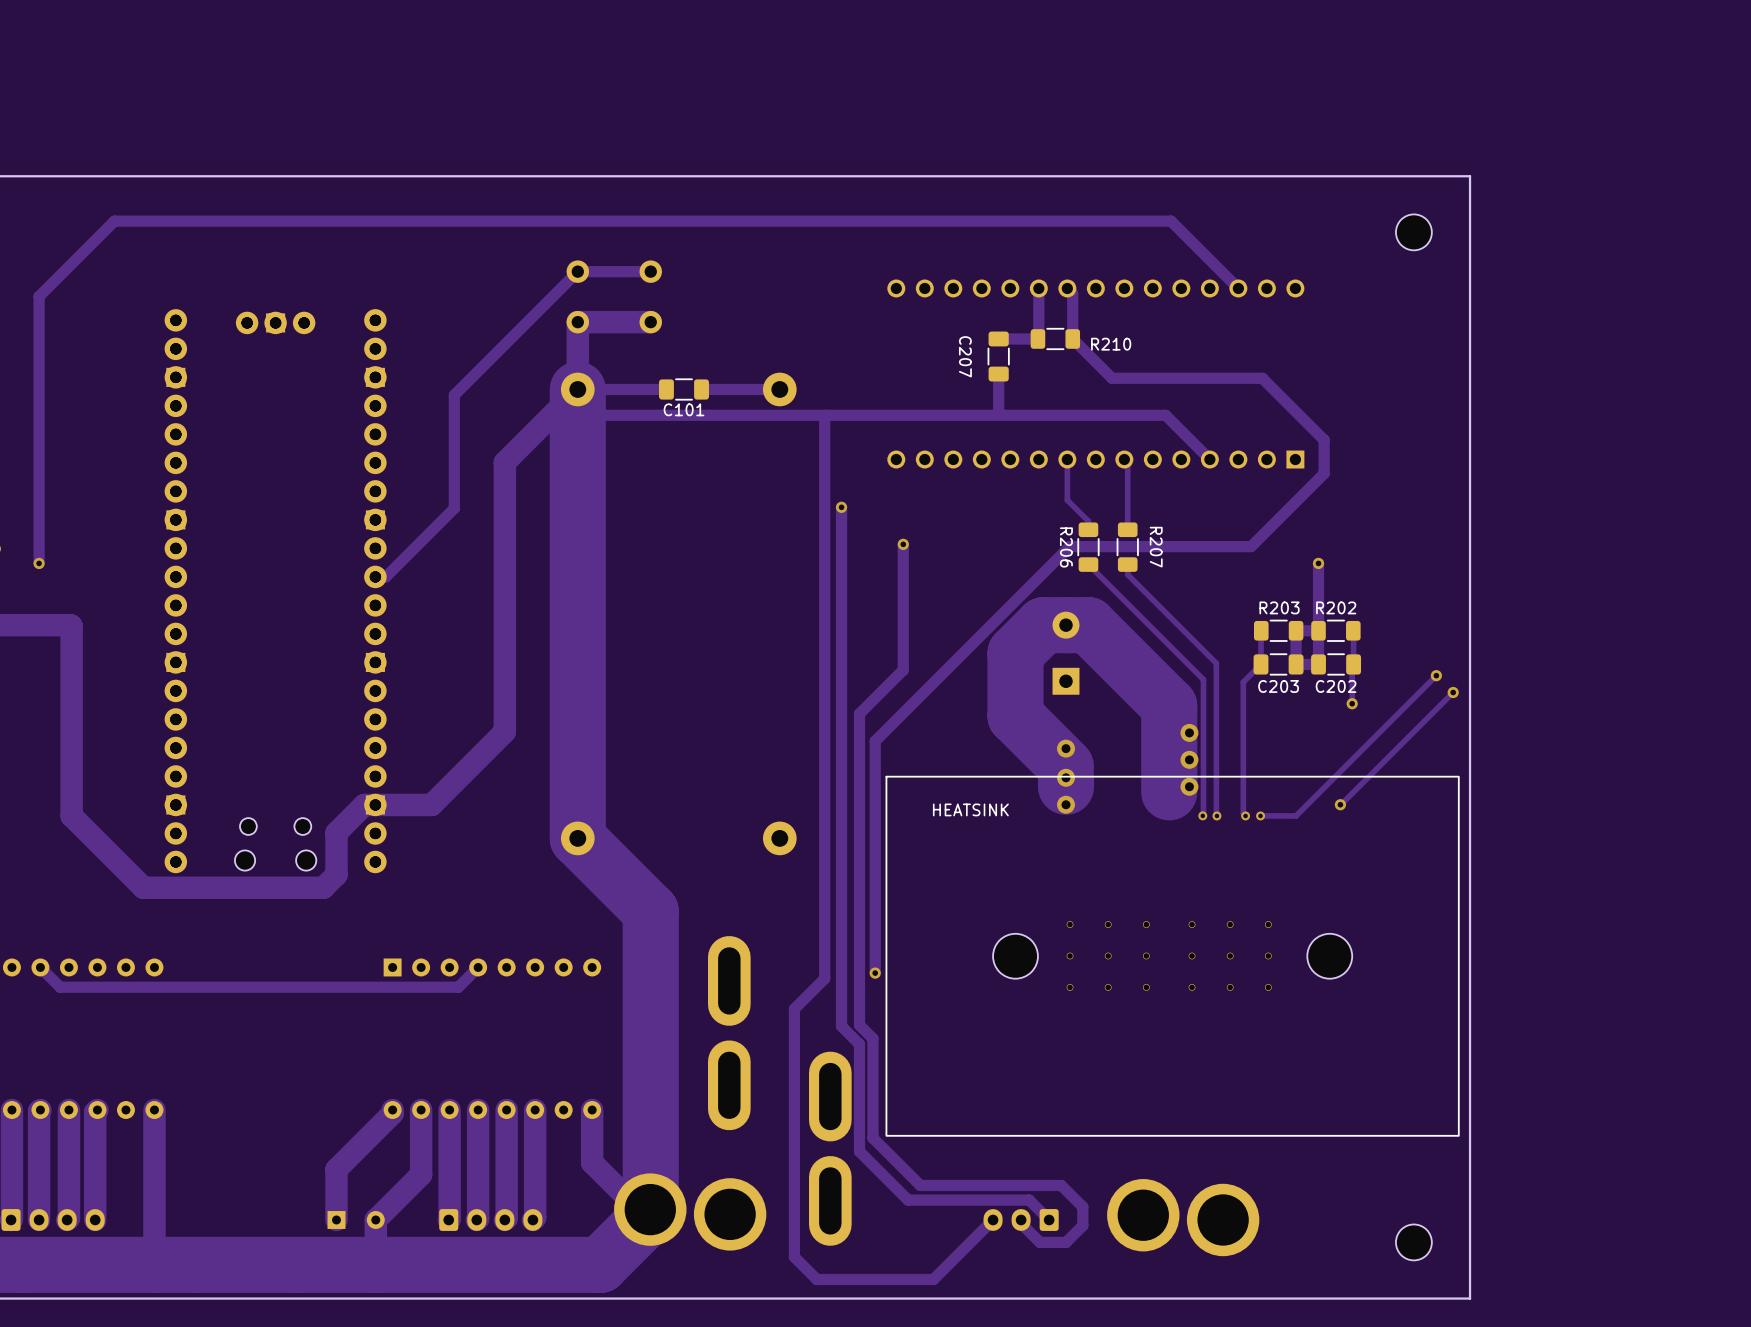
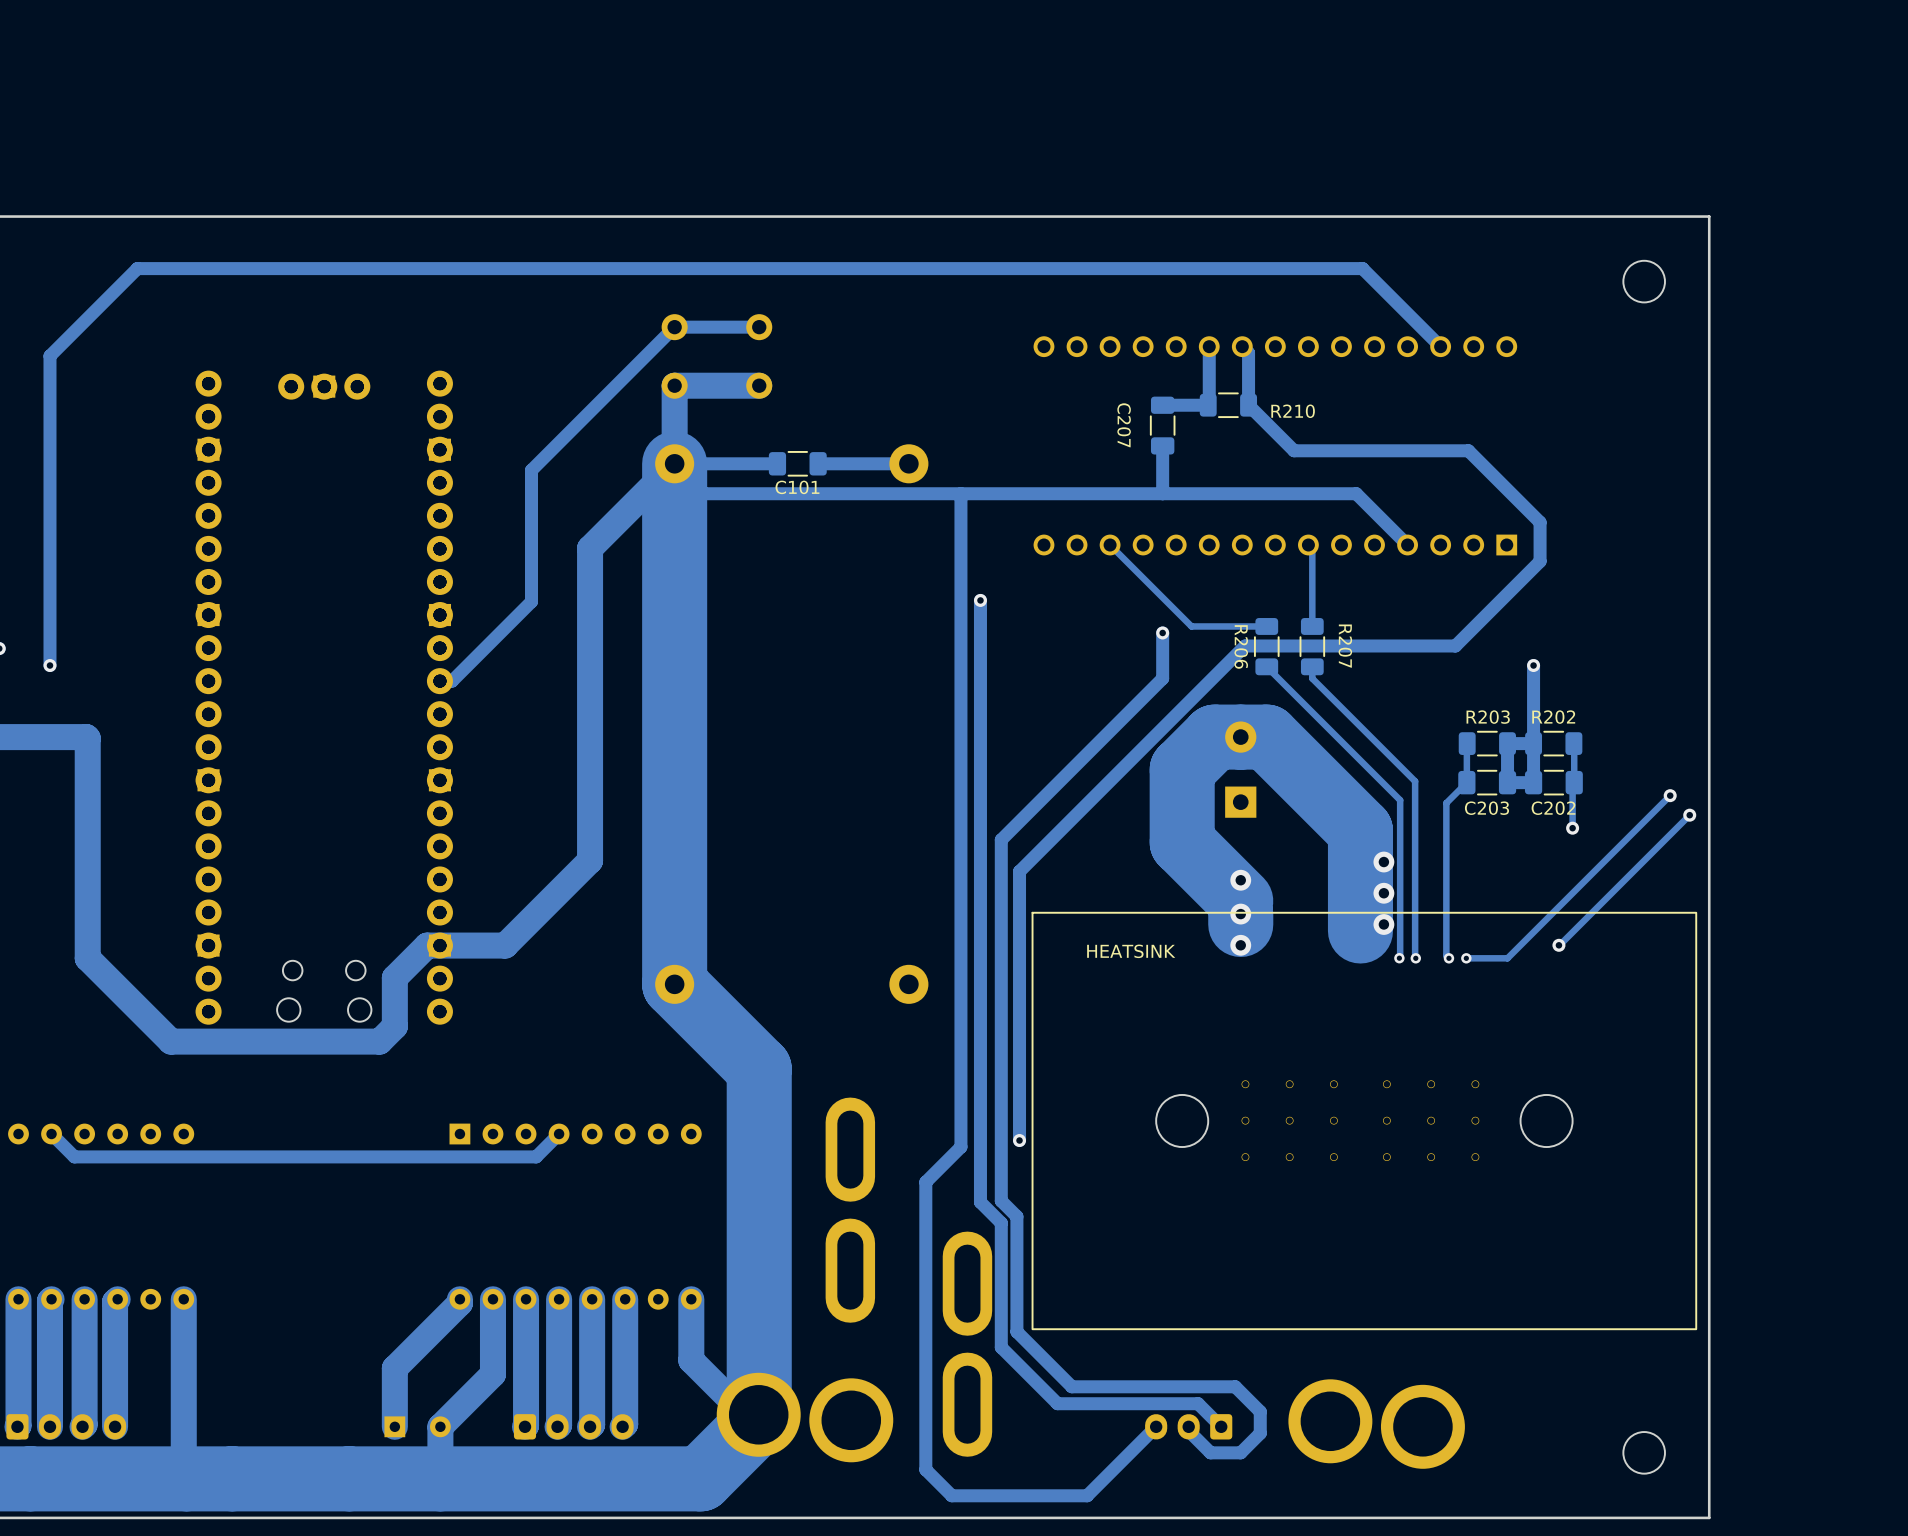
track: (1067, 459) (1067, 500) (1088, 521) (1088, 529) -> (1110, 545) (1191, 626) (1266, 626)
via: none -> (1162, 632)
track: (903, 544) (903, 670) -> (1162, 632) (1162, 678) (1052, 789)
via: (903, 544) -> none

